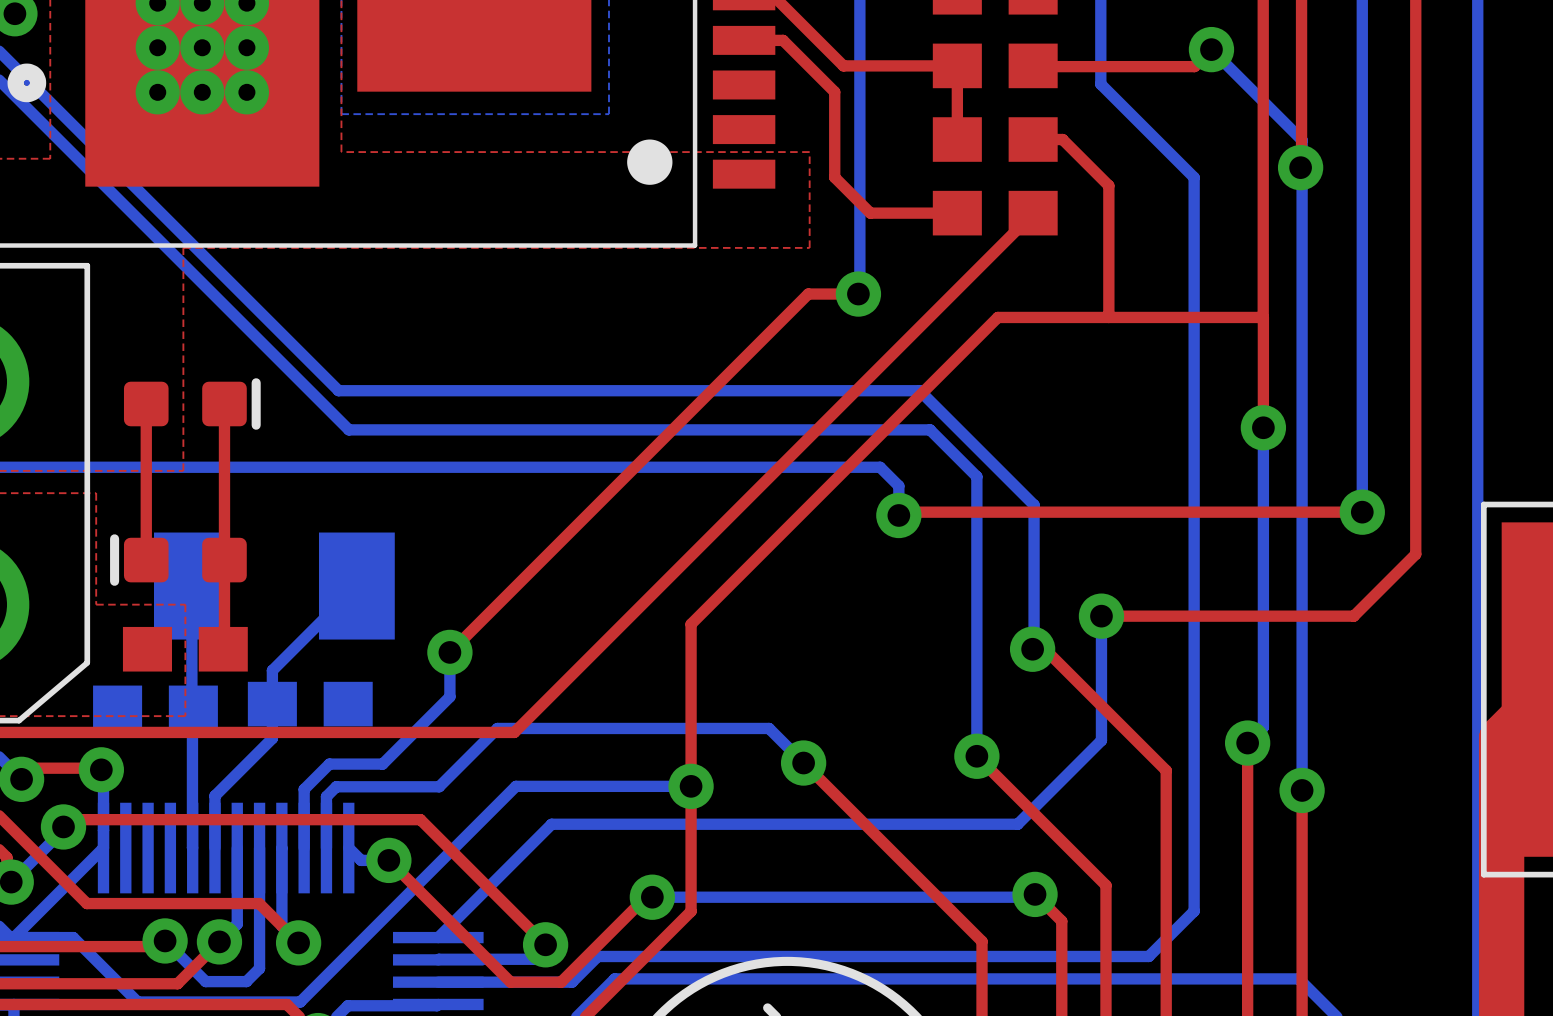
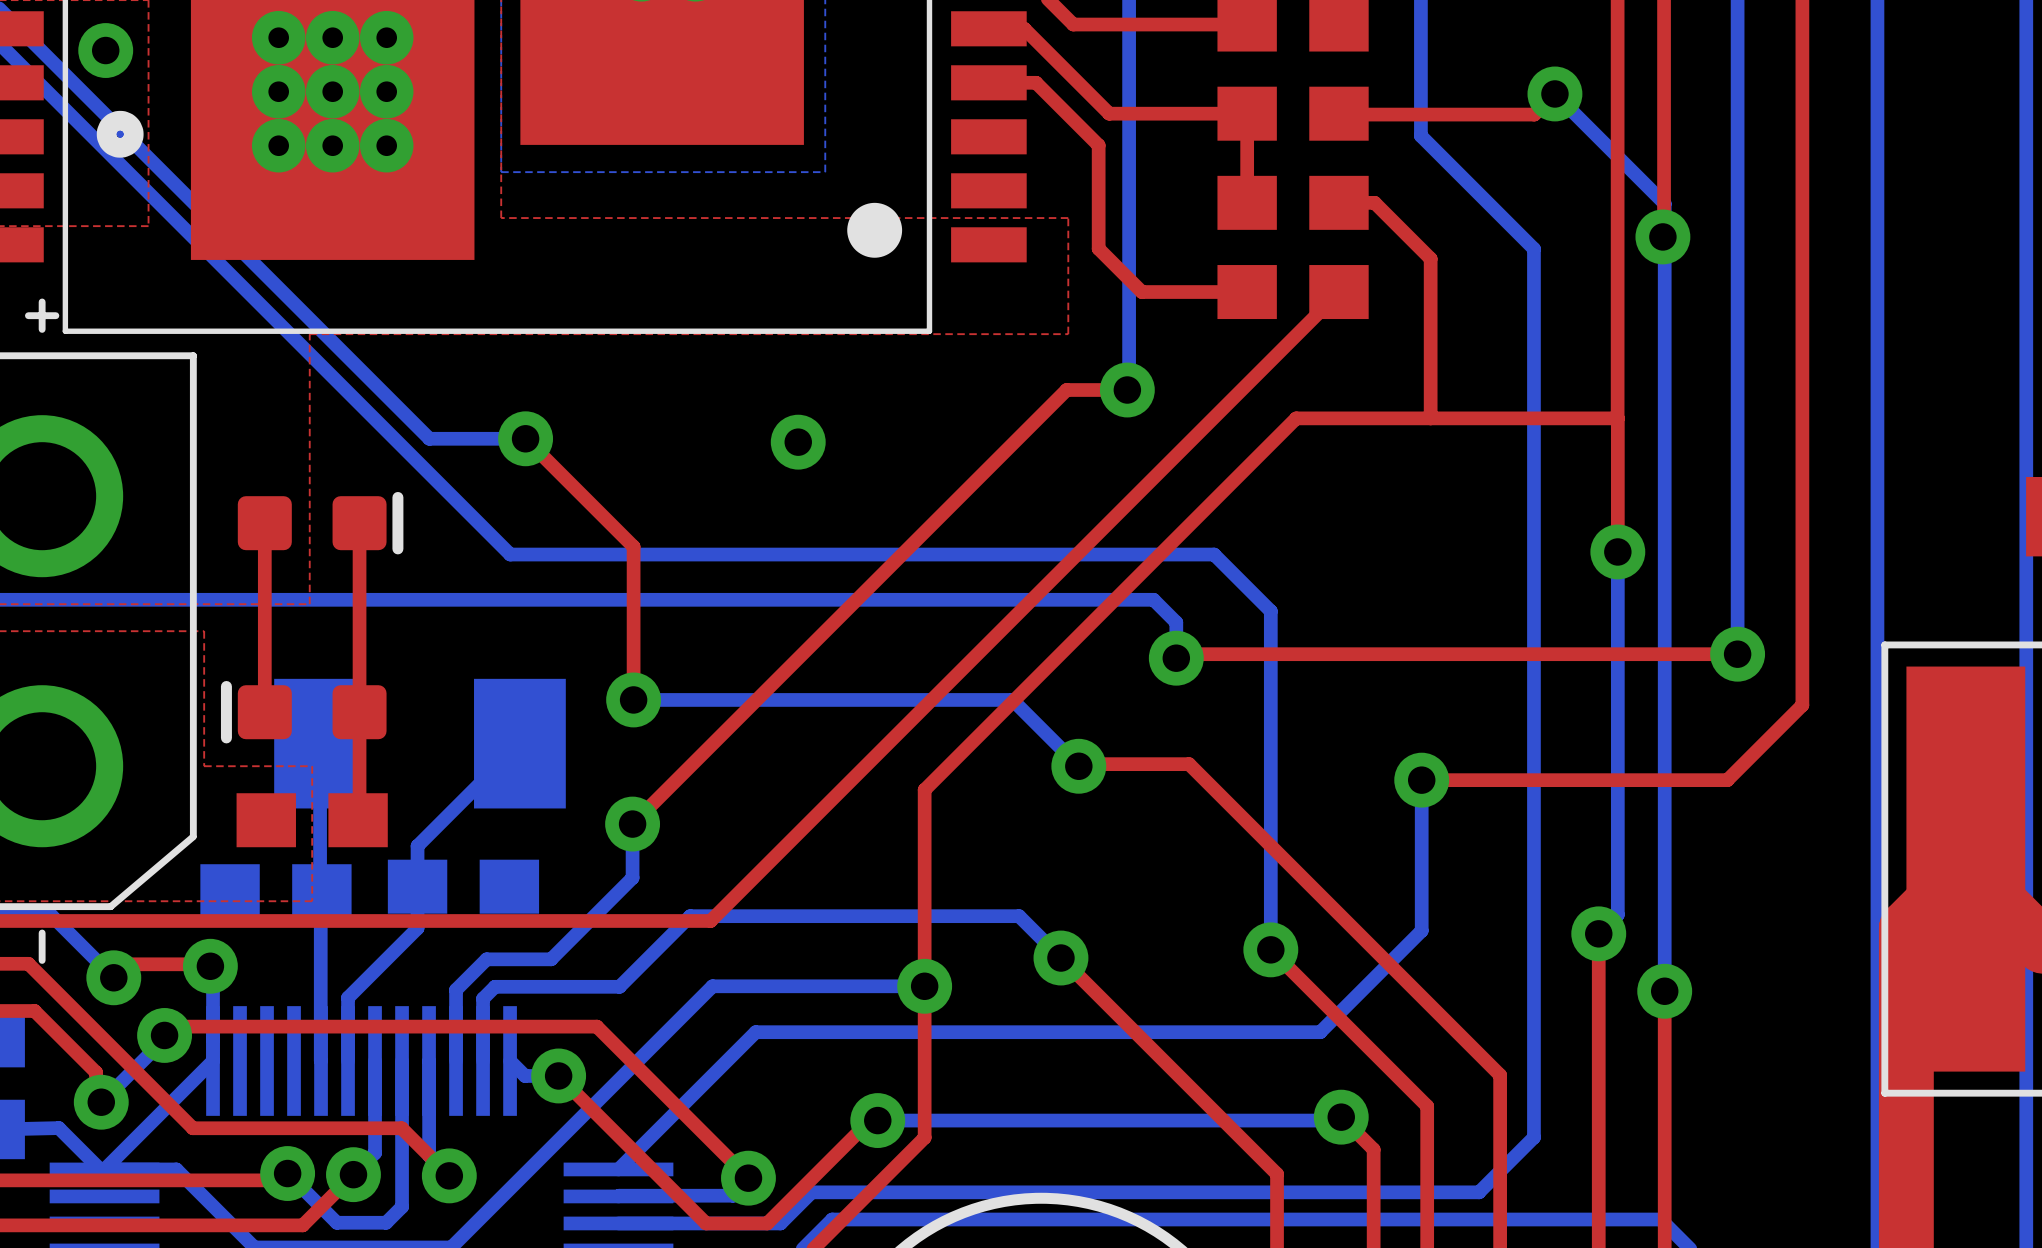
bottom track: (282, 334) (338, 390) (919, 390) (1034, 505) (1032, 649) -> (429, 438) (525, 438)
top track: none -> (525, 438) (633, 546) (633, 699)
via: none -> (525, 438)
via: none -> (798, 442)
bottom track: none -> (633, 699) (1012, 699) (1078, 766)
via: none -> (633, 699)
top track: (1032, 649) (1044, 649) (1166, 770) (1166, 859) -> (1078, 766) (1080, 764) (1189, 764) (1500, 1075)
via position: (1032, 649) -> (1078, 766)

